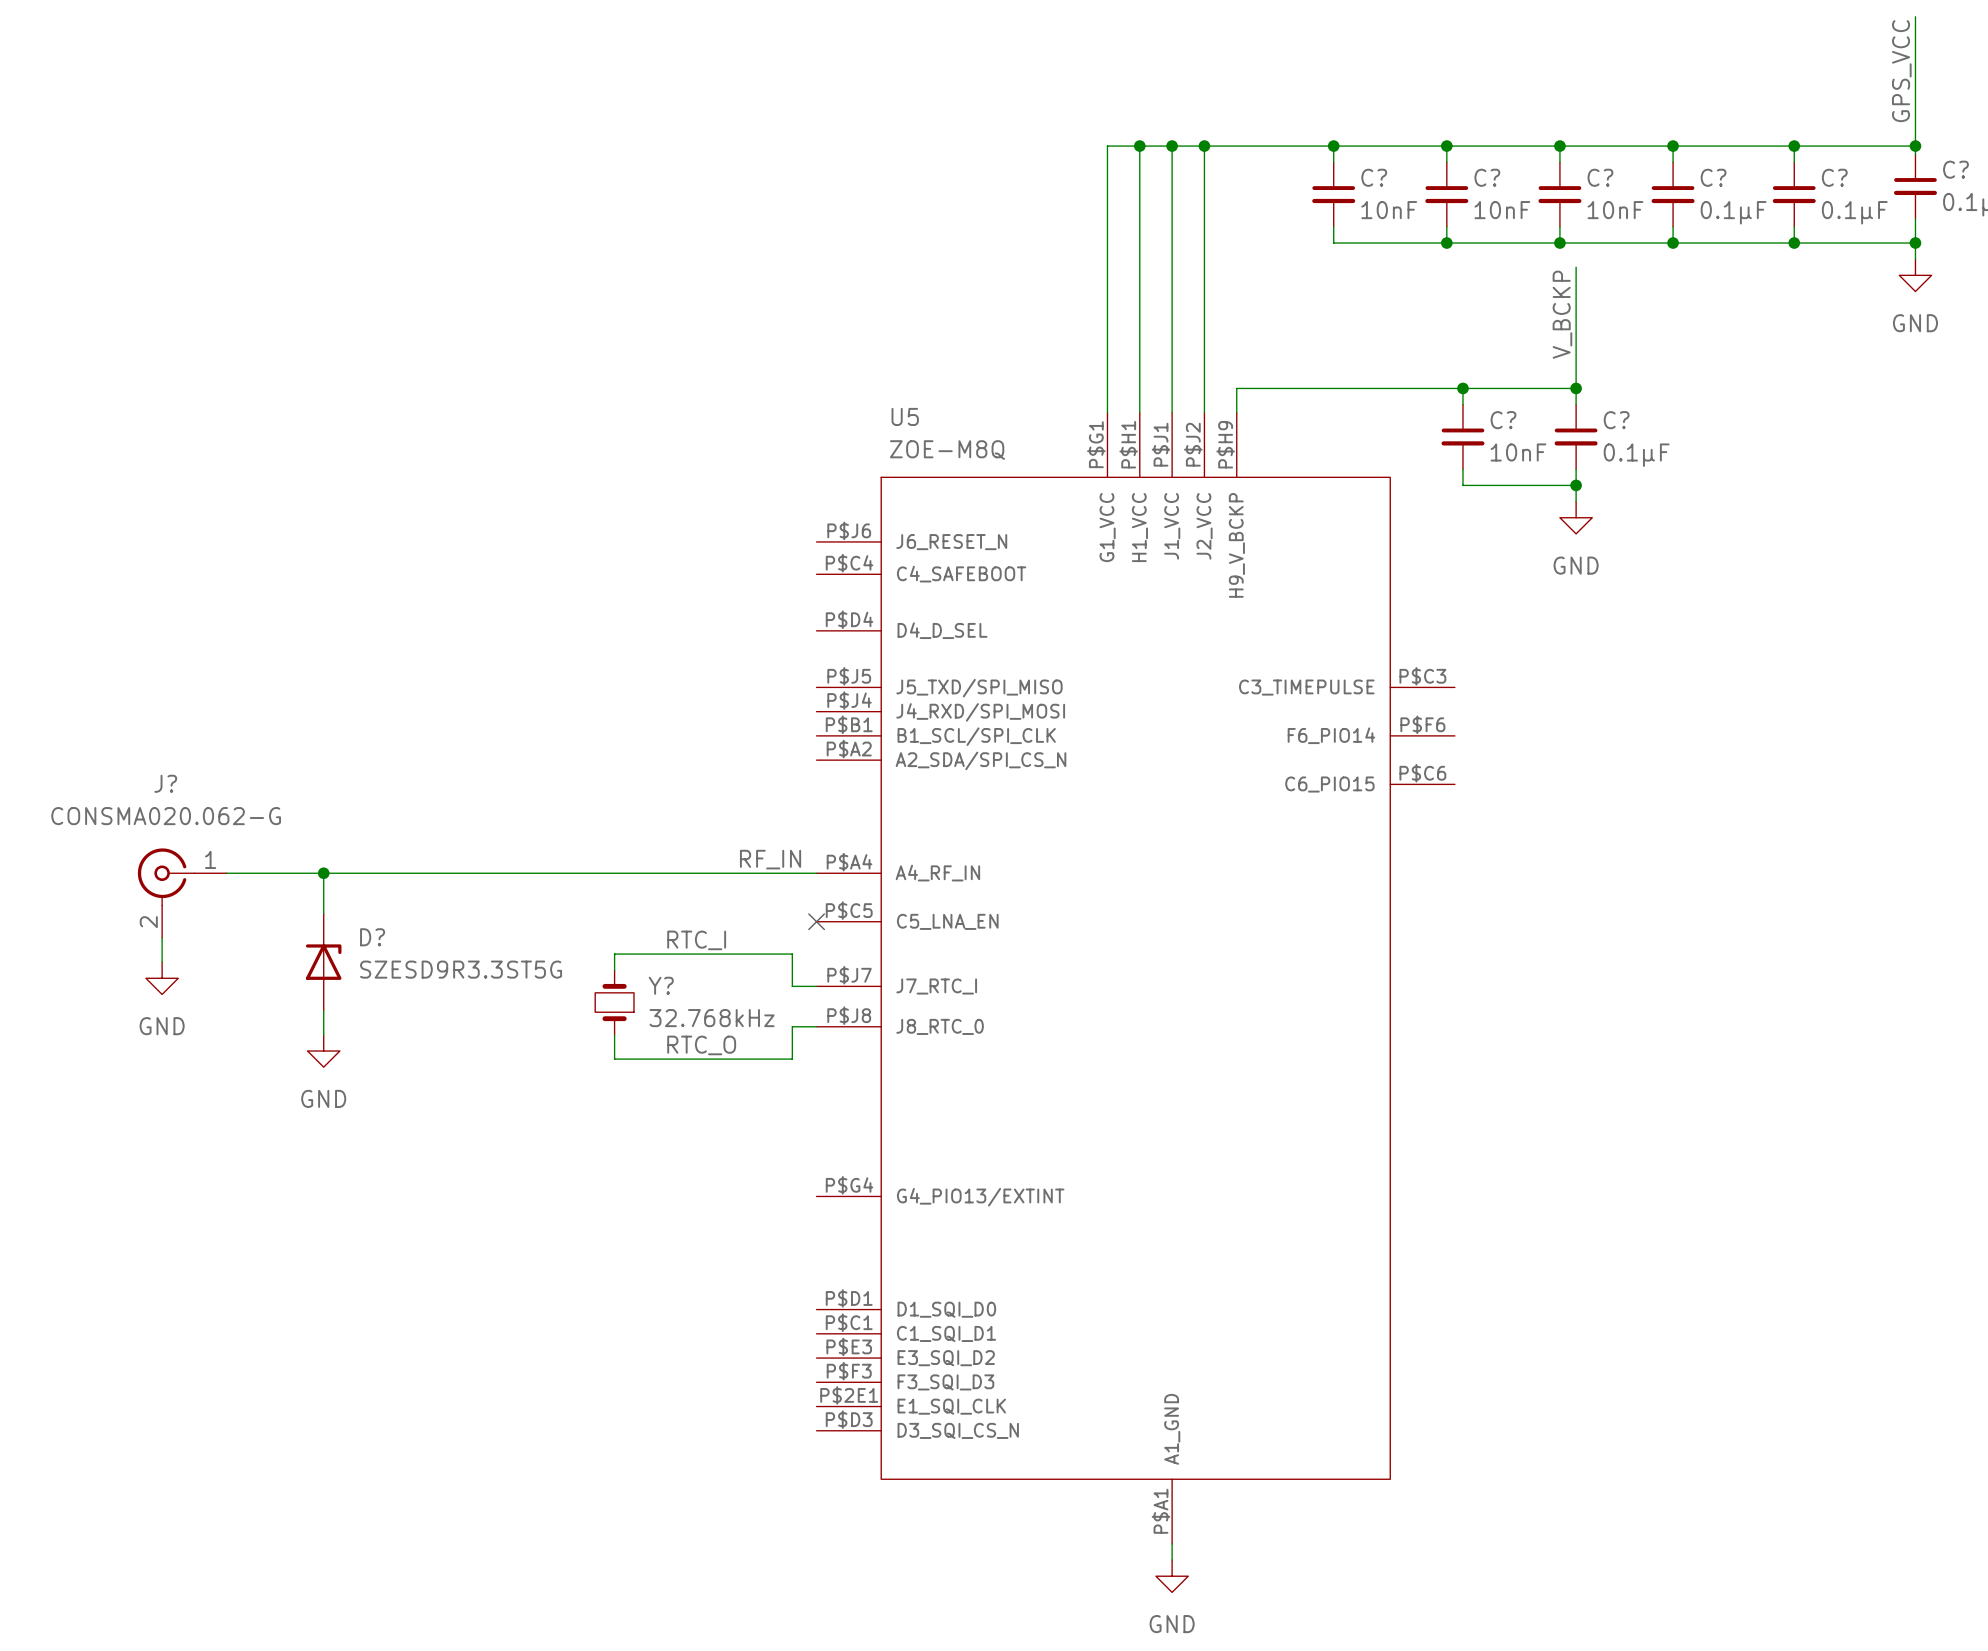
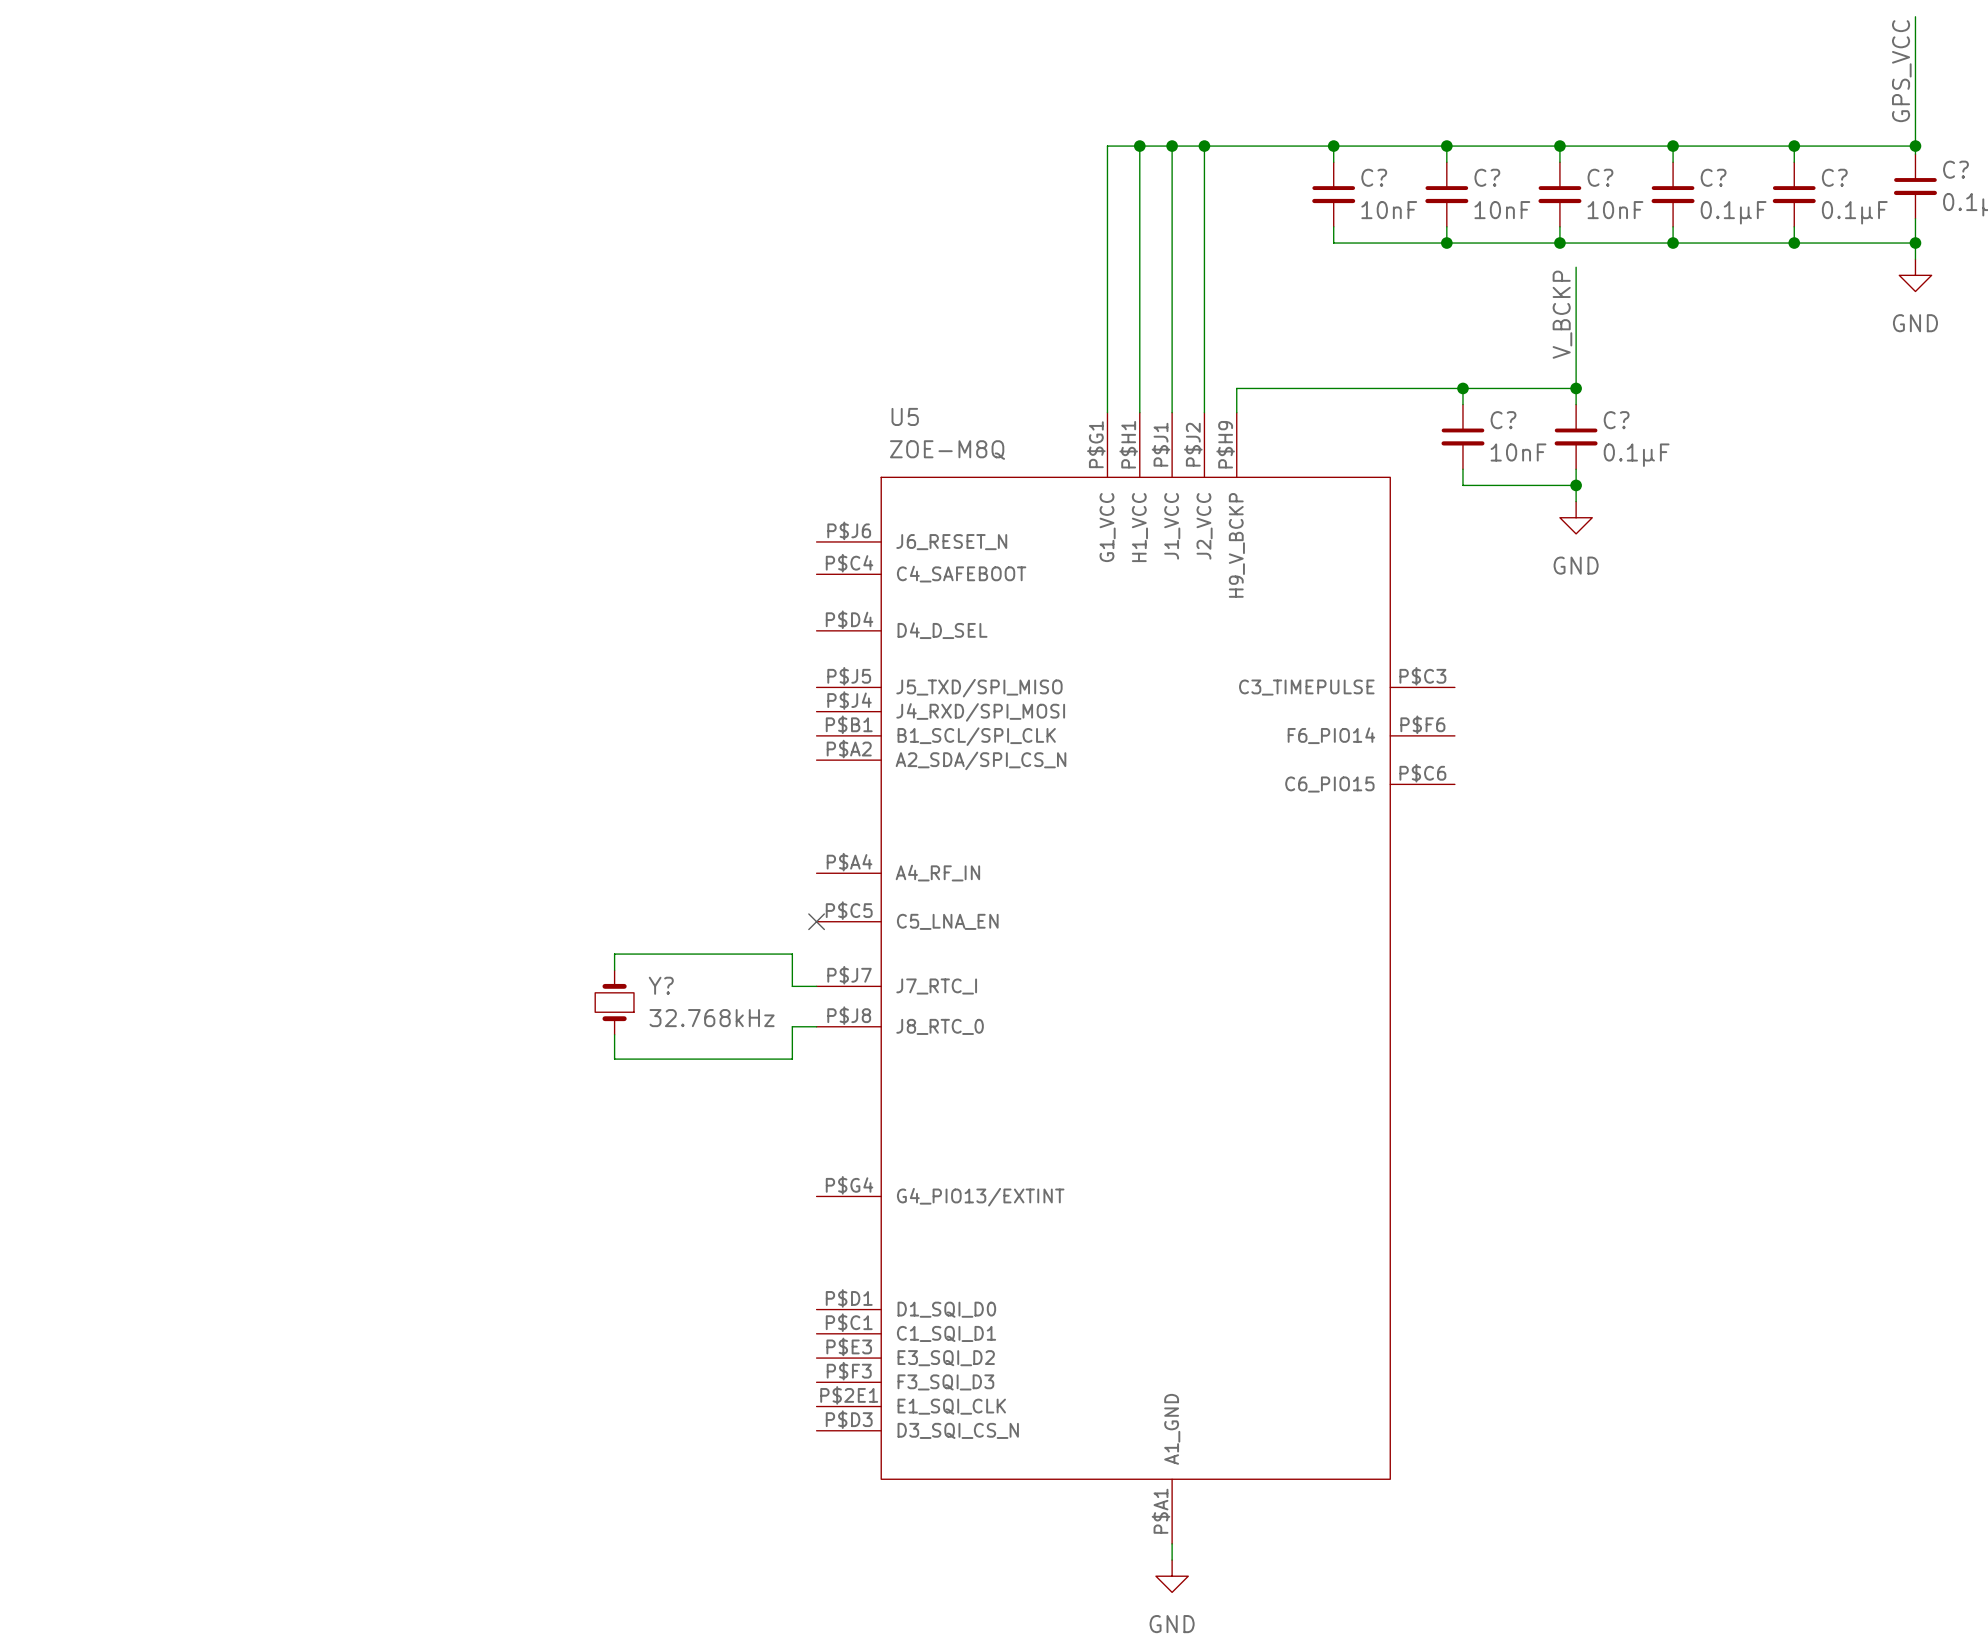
label: RF_IN (770, 859) -> none
wire: (226, 873) (816, 873) -> none
wire: (323, 873) (323, 913) -> none
junction: (323, 873) -> none
J?: CONSMA020.062-G (182, 893) -> none
wire: (162, 937) (162, 962) -> none
label: RTC_I (696, 940) -> none
D?: SZESD9R3.3ST5G (323, 962) -> none
power symbol: GND (162, 978) -> none
wire: (323, 1010) (323, 1034) -> none
label: RTC_O (701, 1045) -> none
power symbol: GND (323, 1051) -> none

